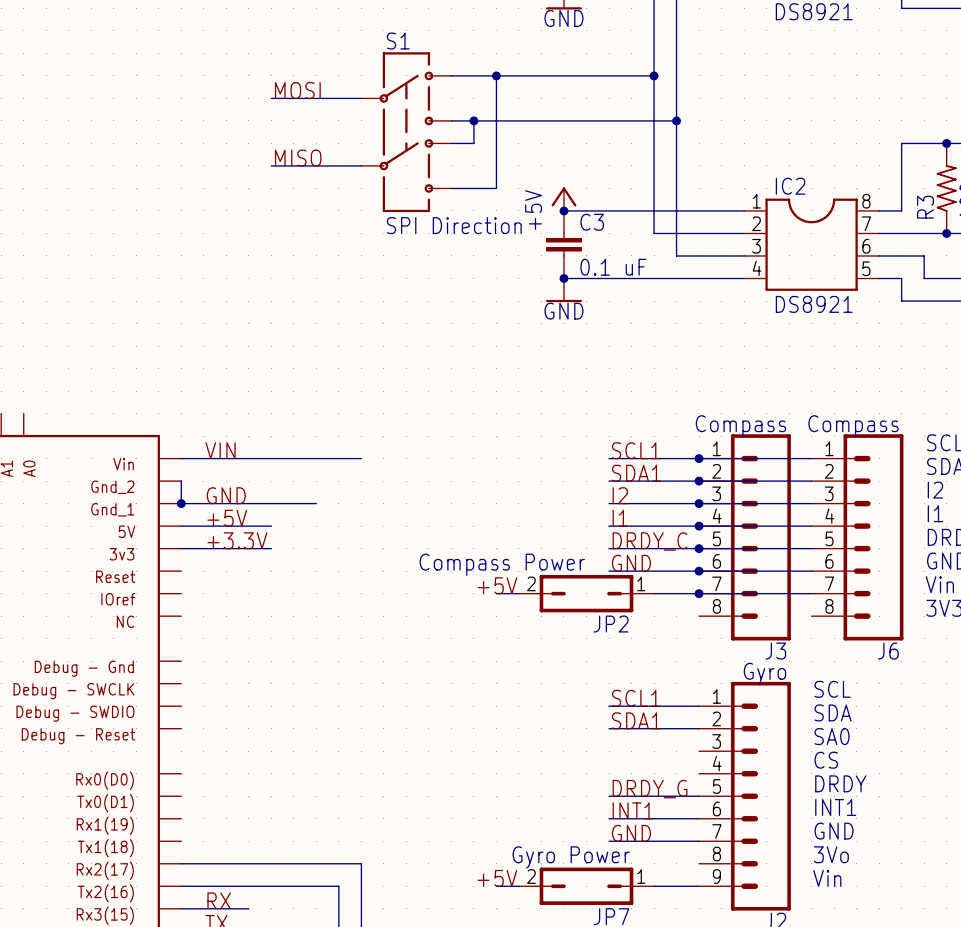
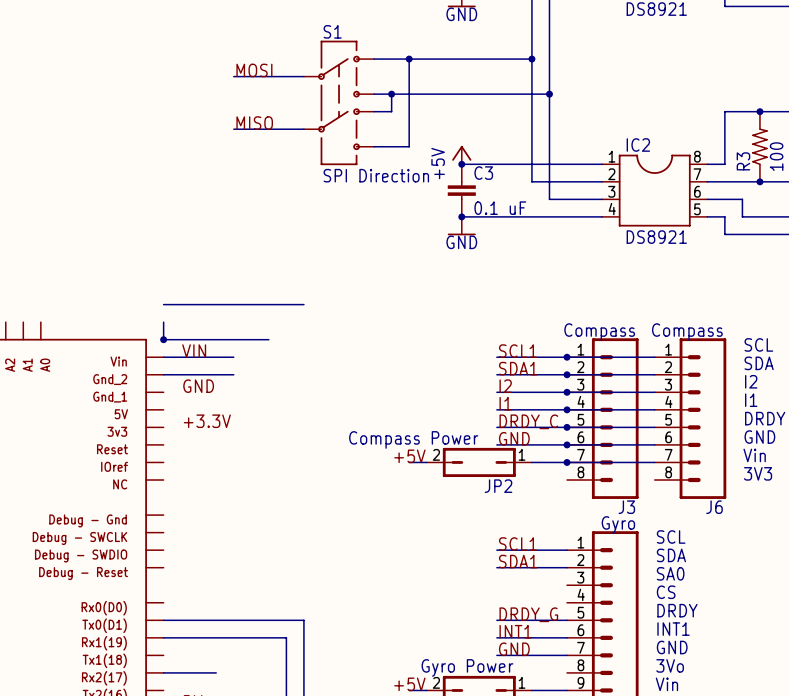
wire: none -> (163, 304) (303, 304)
wire: none -> (163, 322) (163, 339) (268, 339)
junction: none -> (163, 339)
wire: (271, 458) (361, 458) -> none
wire: (181, 481) (181, 503) (316, 503) -> (163, 374) (233, 374)
junction: (181, 503) -> none
label: +5V (227, 518) -> none
wire: (181, 526) (271, 526) -> none
wire: (181, 548) (271, 548) -> none
wire: (248, 863) (361, 863) -> (163, 620) (303, 620) (303, 672)
wire: (181, 886) (338, 886) -> (163, 637) (286, 637) (286, 690)

